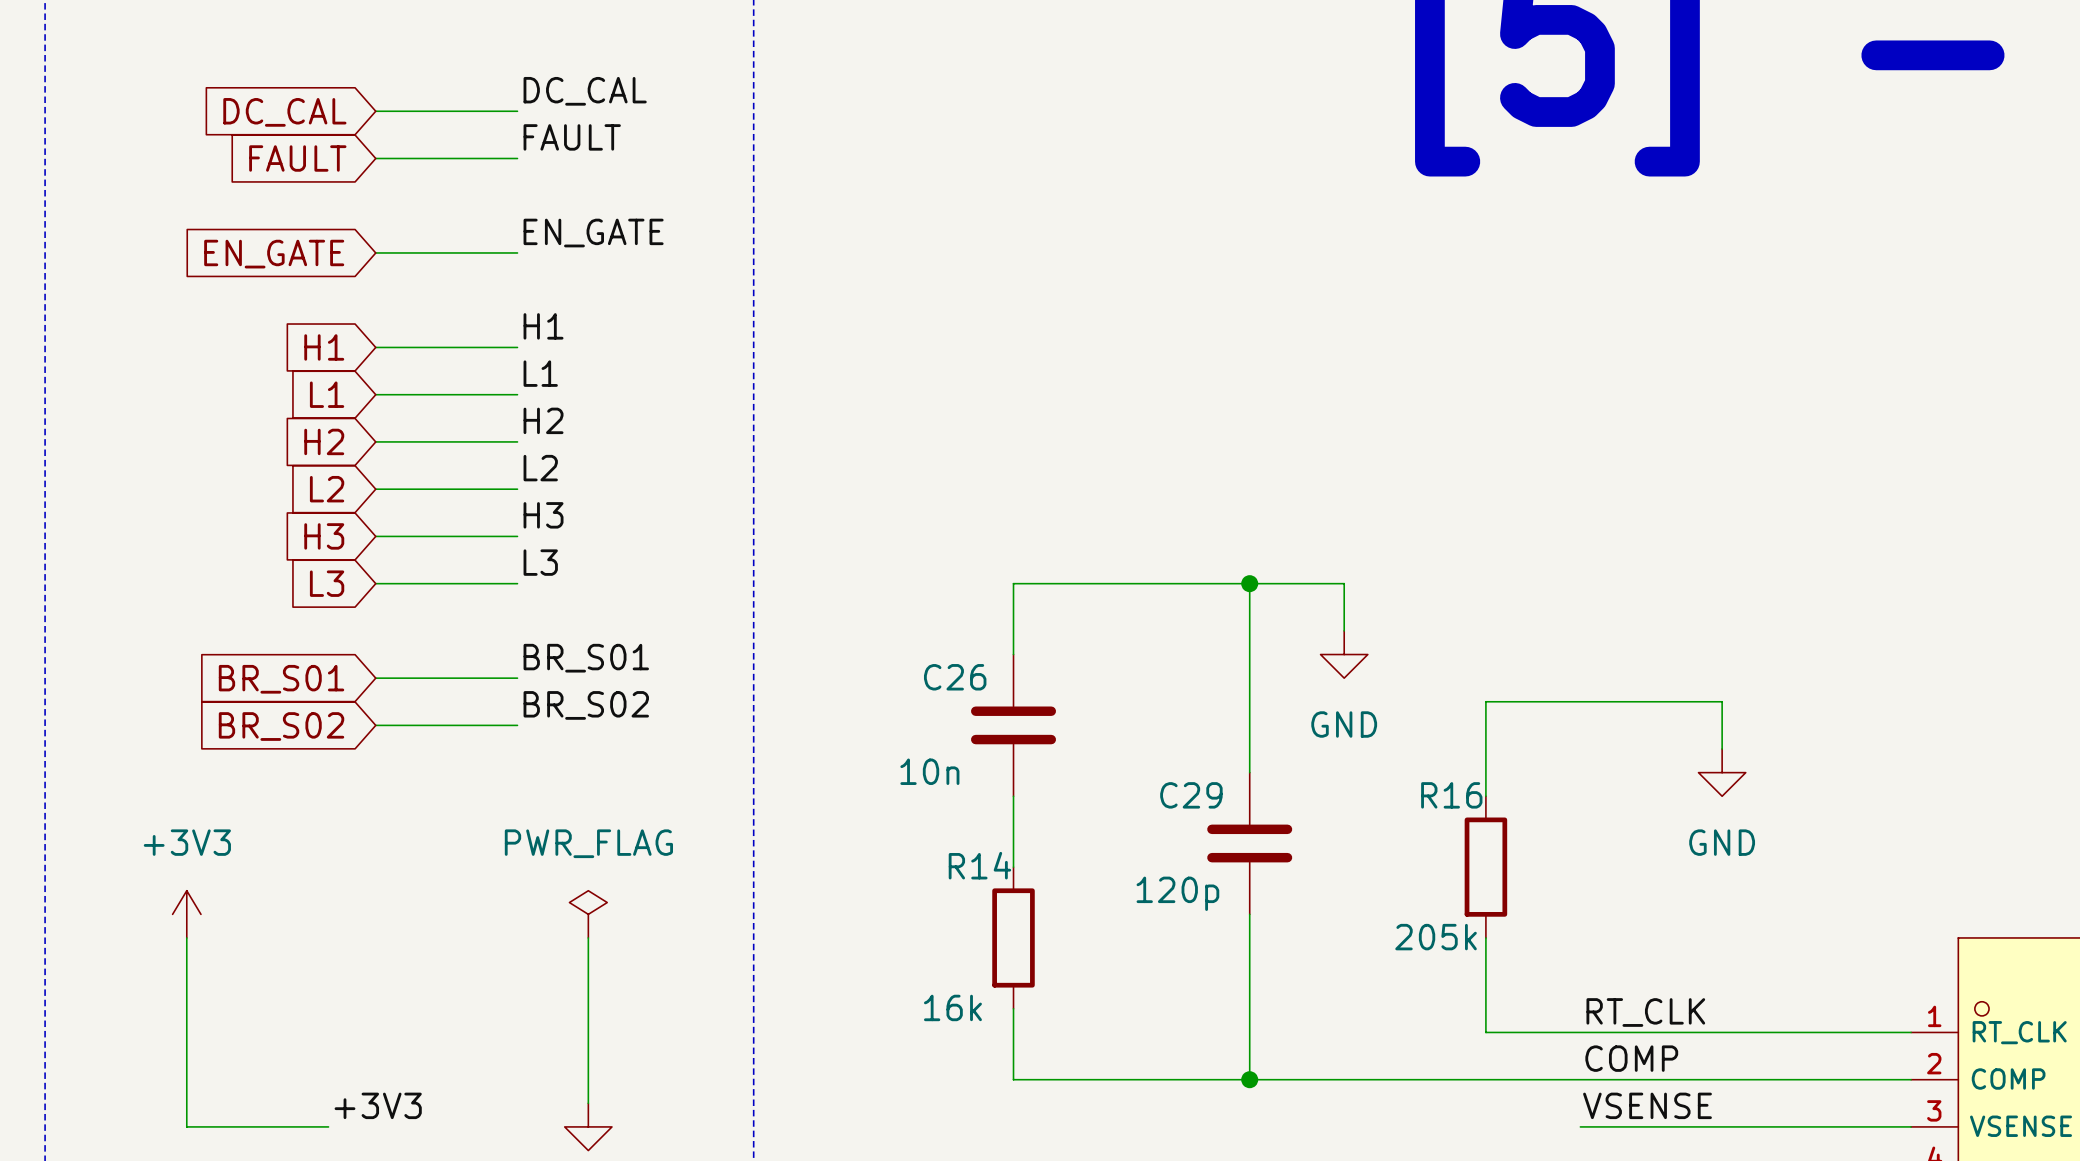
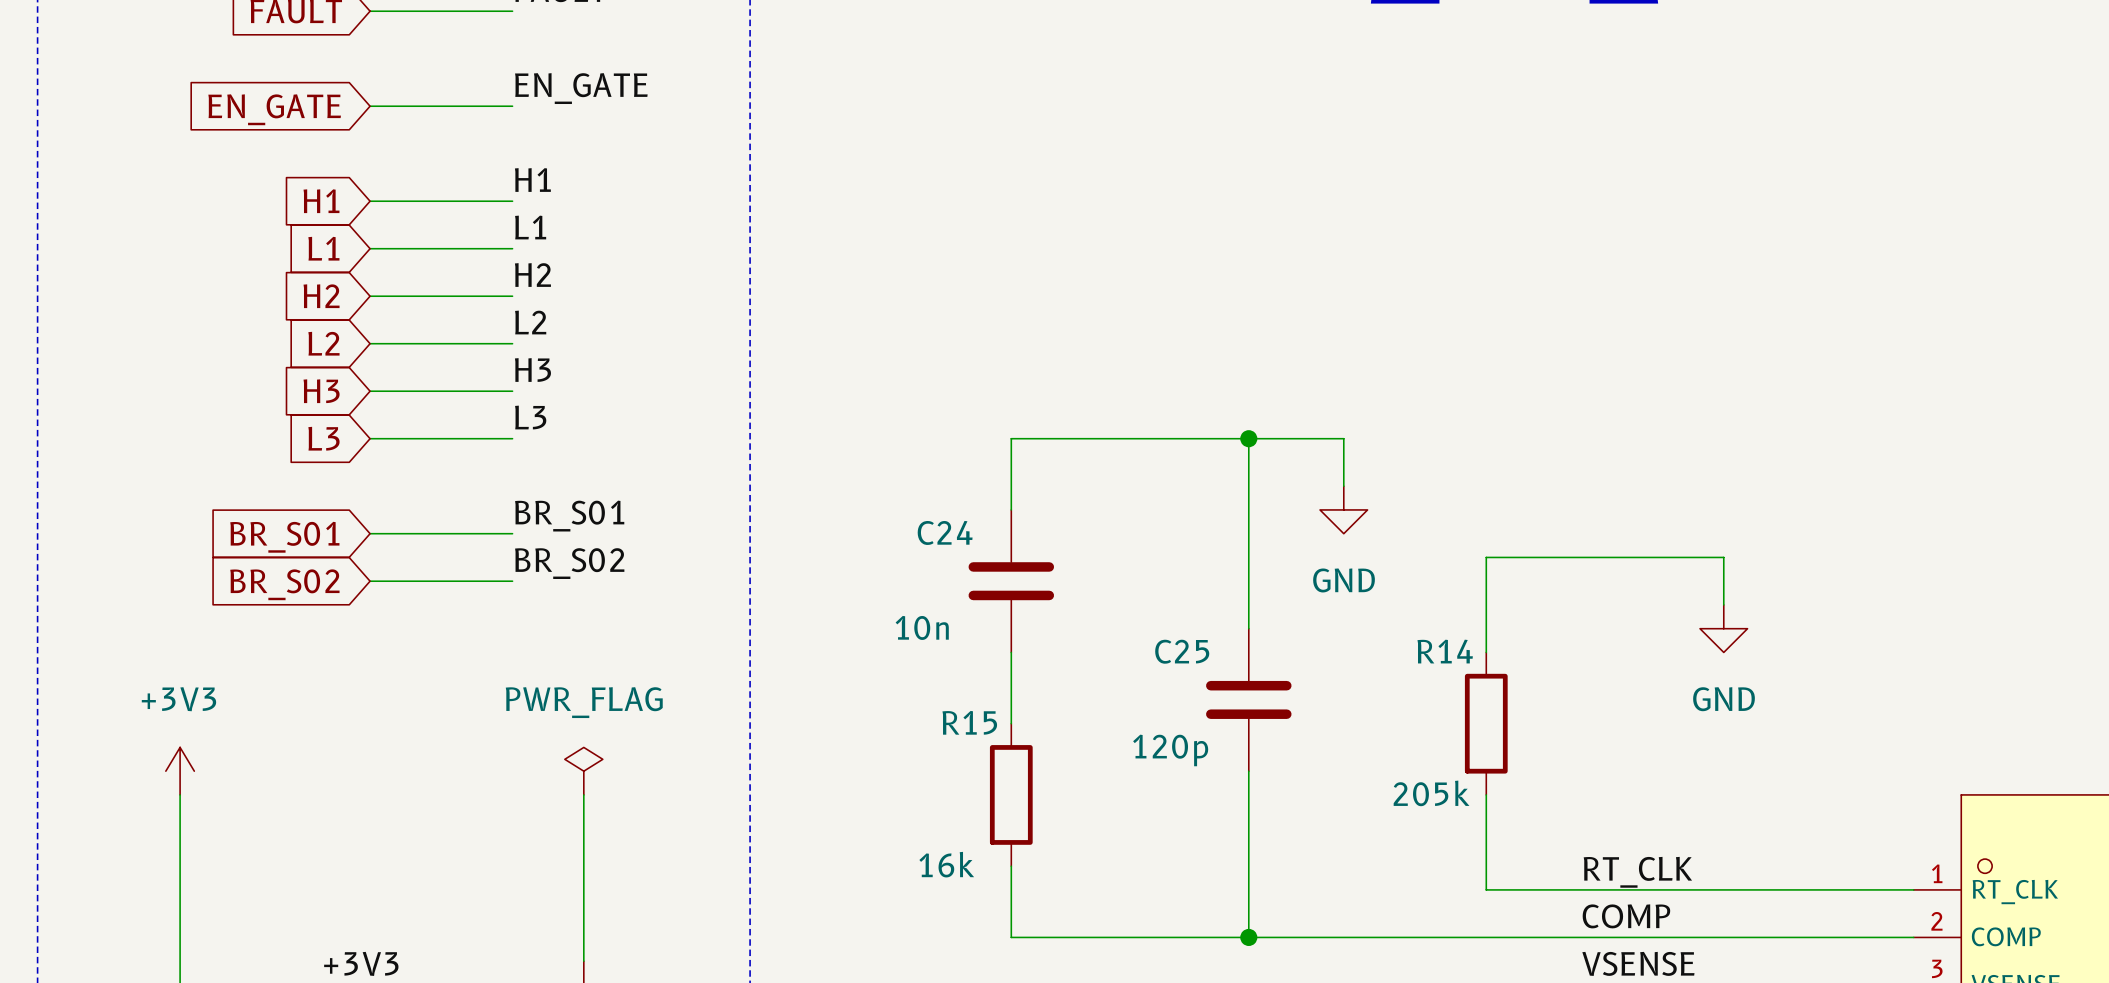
C26 name: C26 (955, 677) -> C24 (945, 532)
C29 name: C29 (1191, 795) -> C25 (1182, 651)
R16 name: R16 (1451, 795) -> R14 (1445, 651)
R14 name: R14 (979, 865) -> R15 (969, 722)

